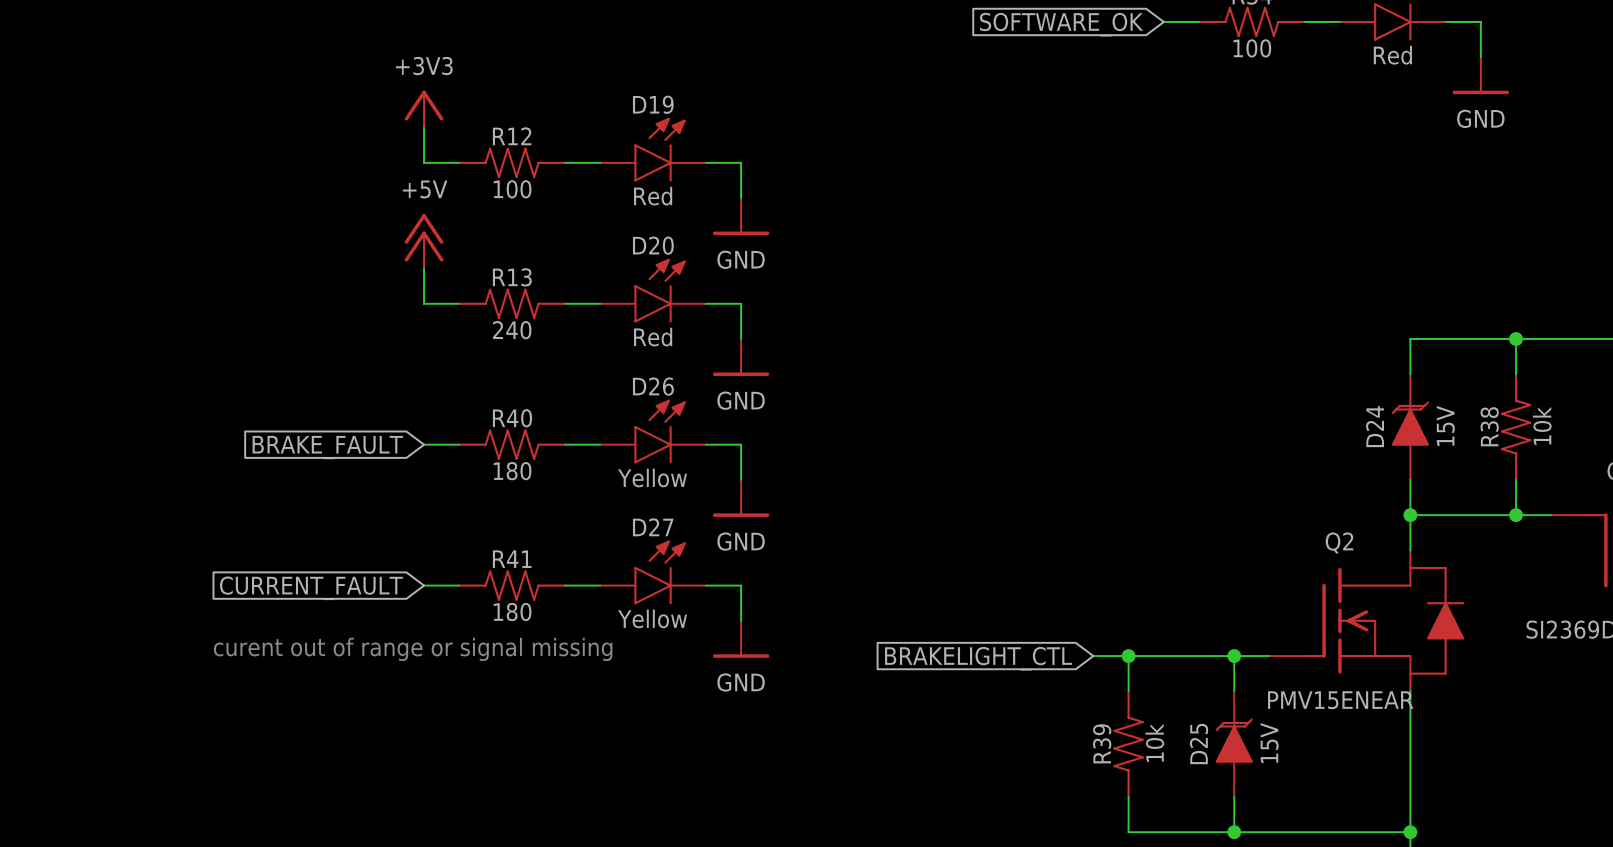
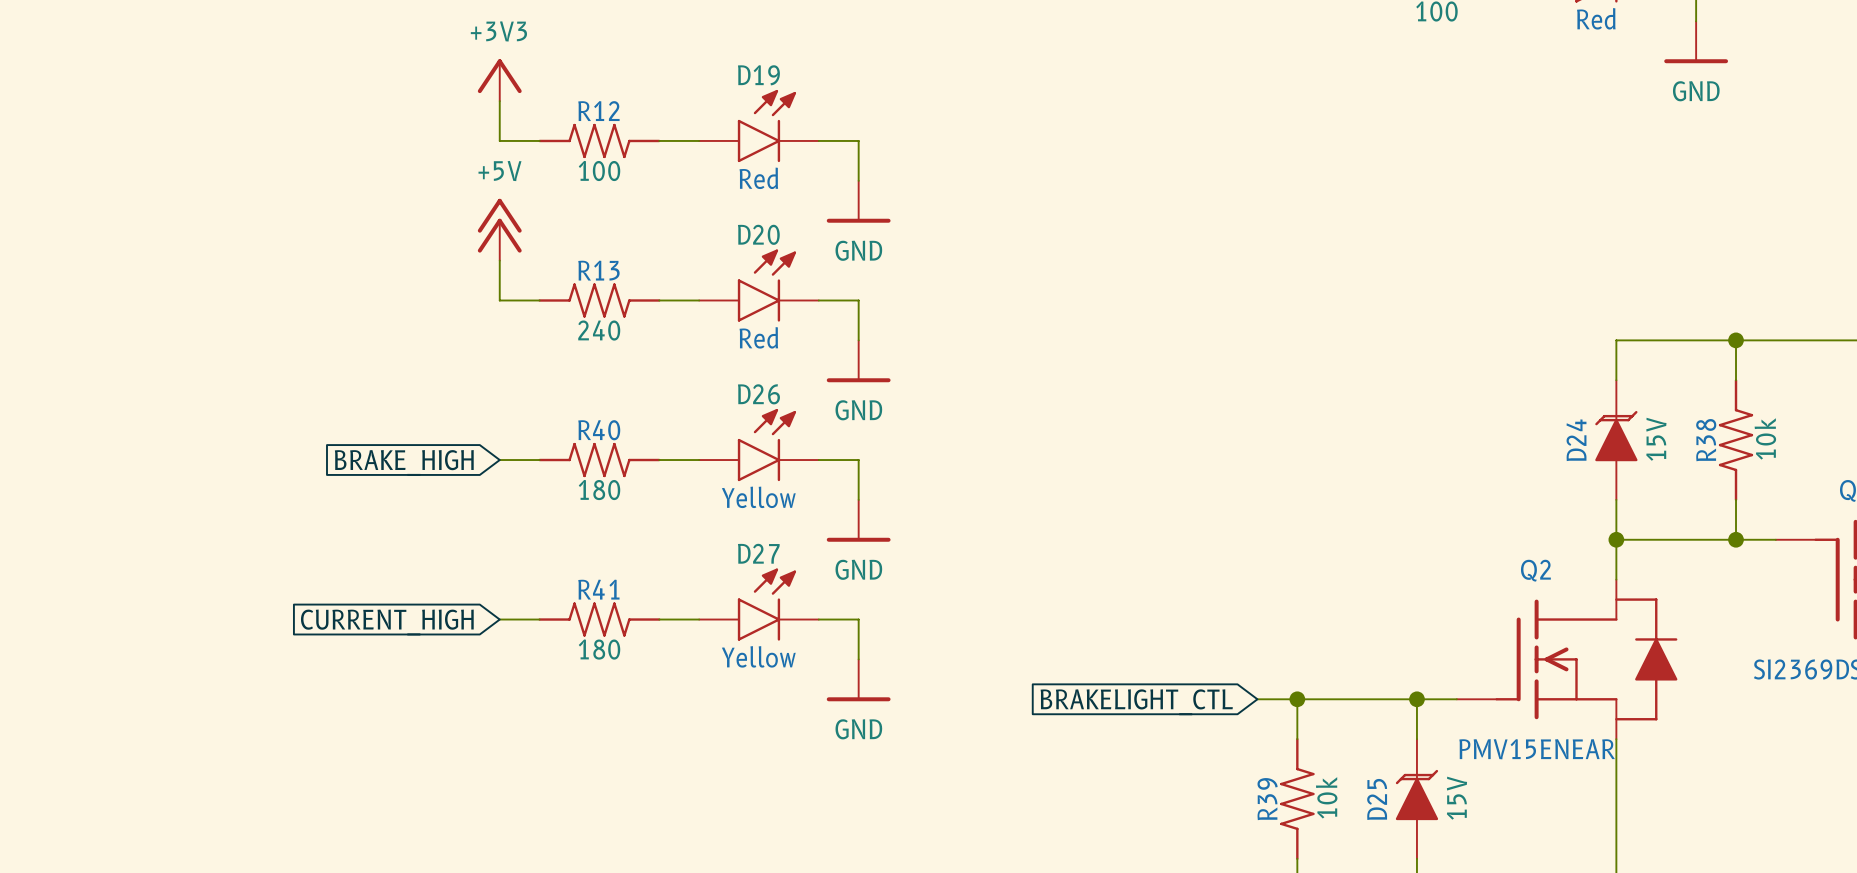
global label: BRAKE_FAULT (327, 447) -> BRAKE_HIGH (404, 462)
global label: CURRENT_FAULT (311, 588) -> CURRENT_HIGH (387, 622)
text: curent out of range or signal missing (413, 649) -> none

